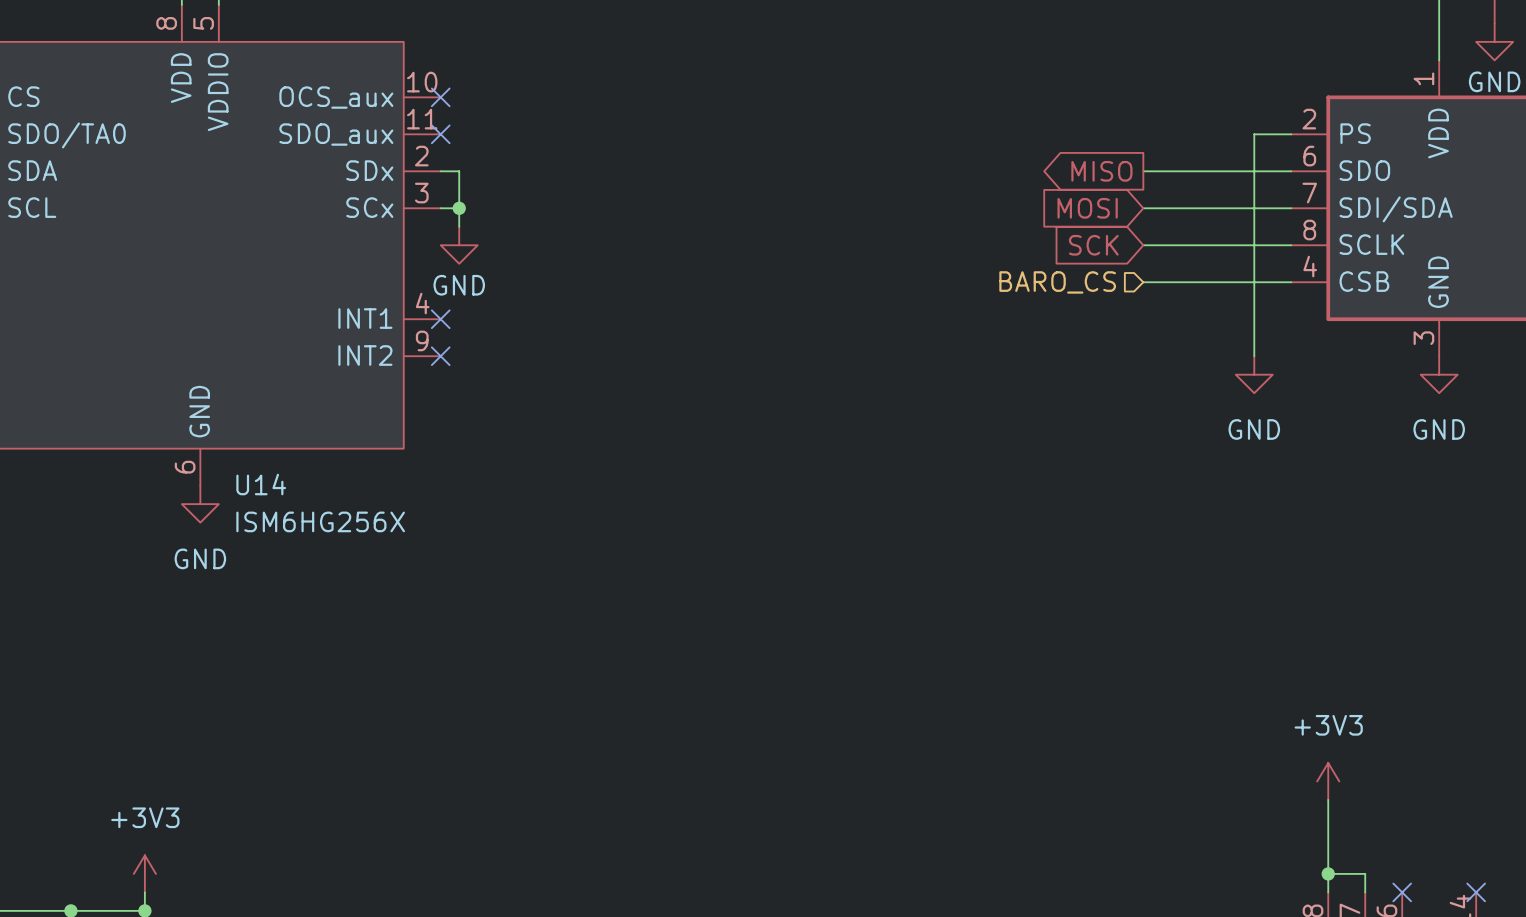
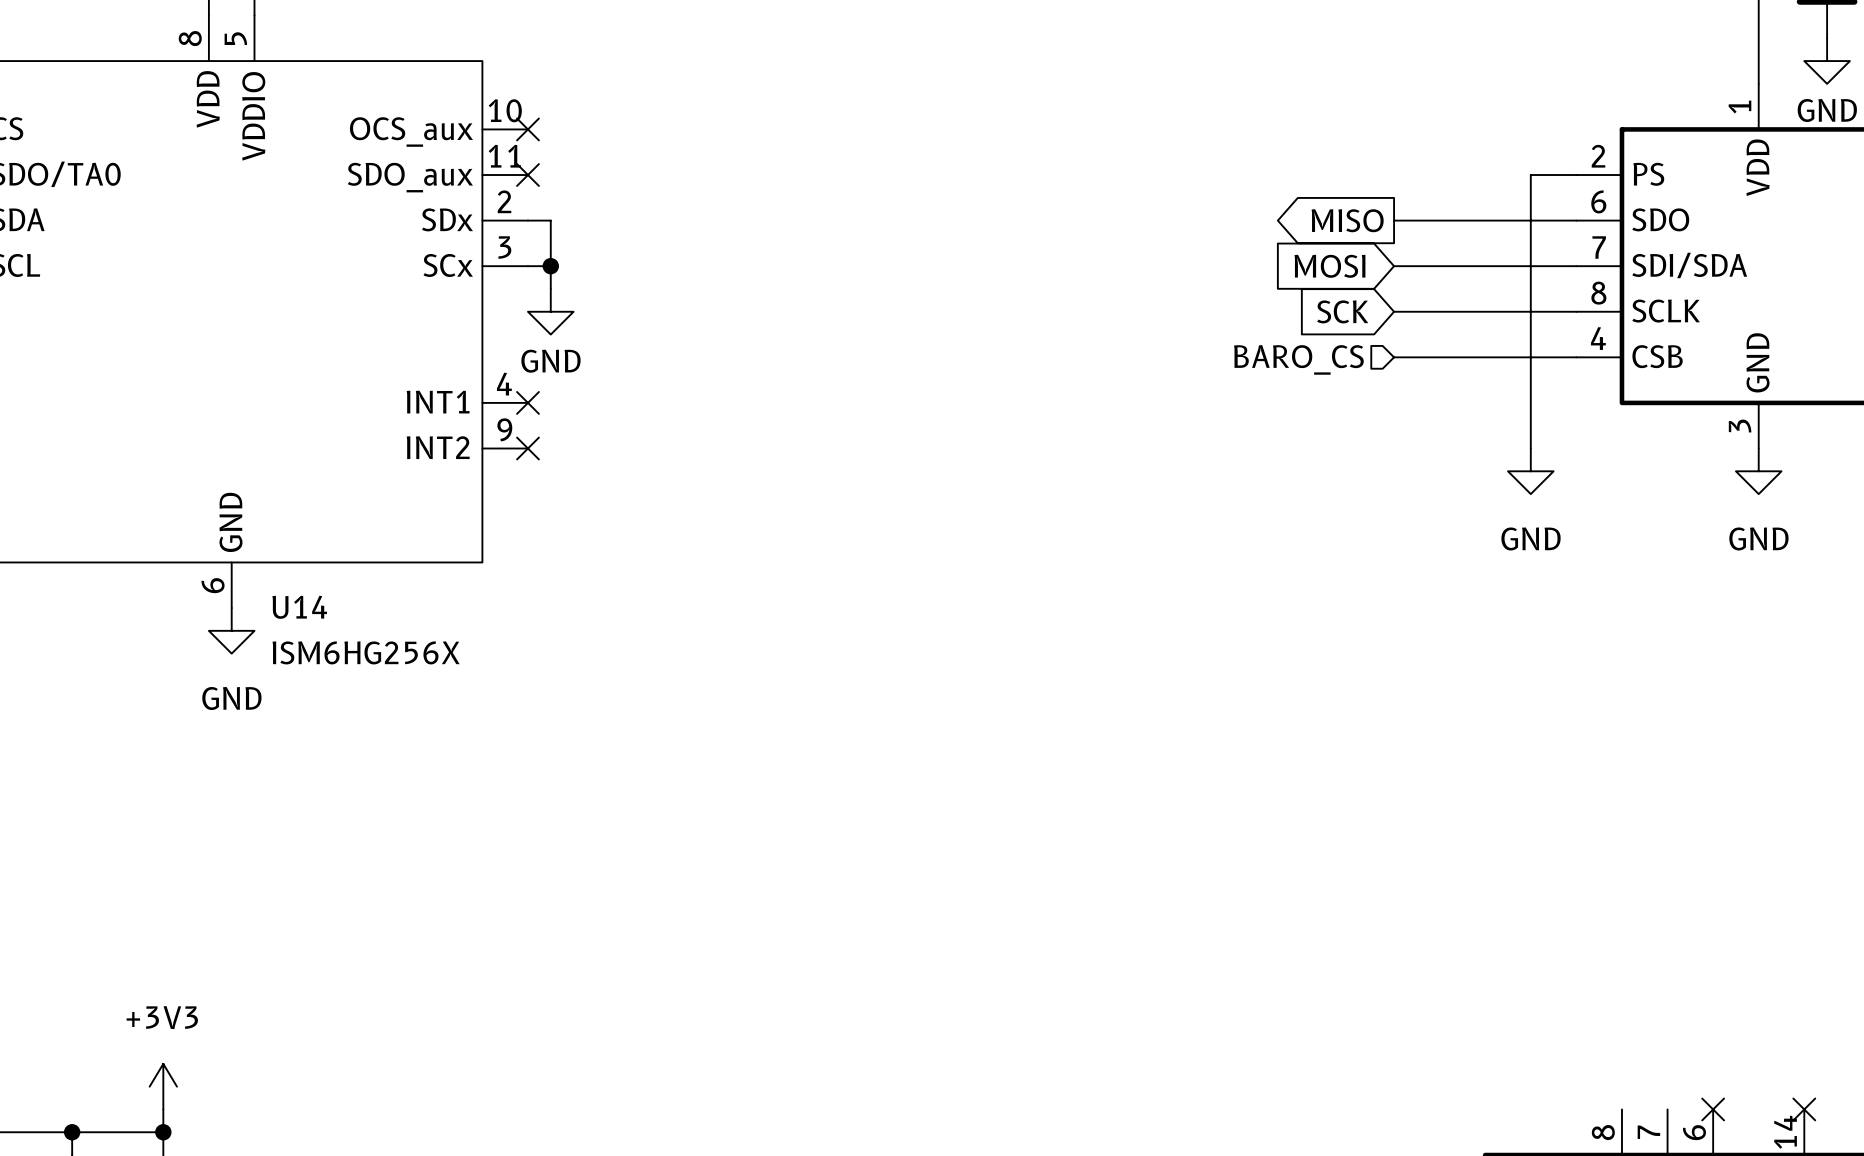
power symbol: +3V3 (1328, 781) -> none
wire: (1328, 799) (1328, 892) -> none
wire: (1328, 873) (1365, 873) (1365, 892) -> none
junction: (1328, 873) -> none

